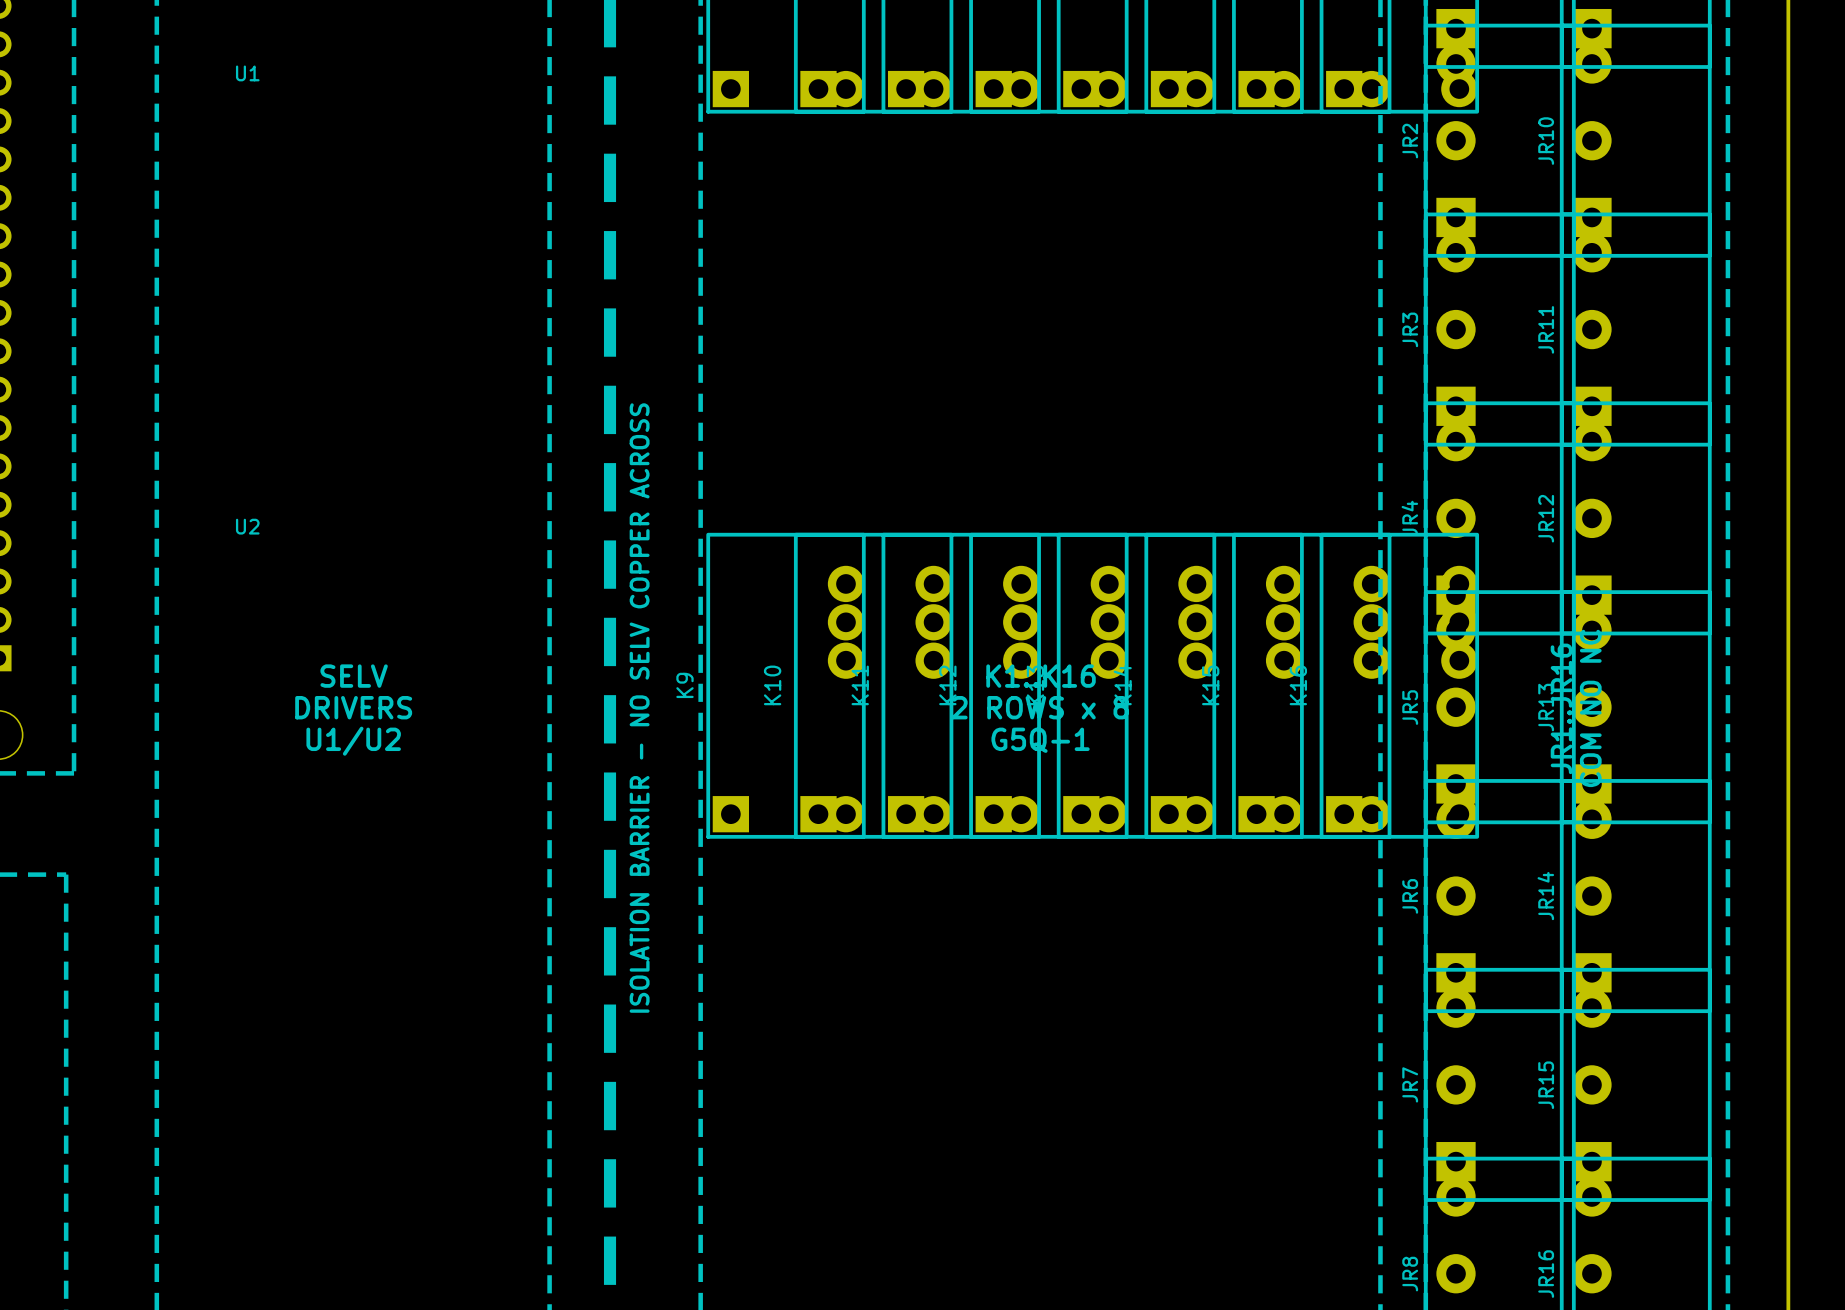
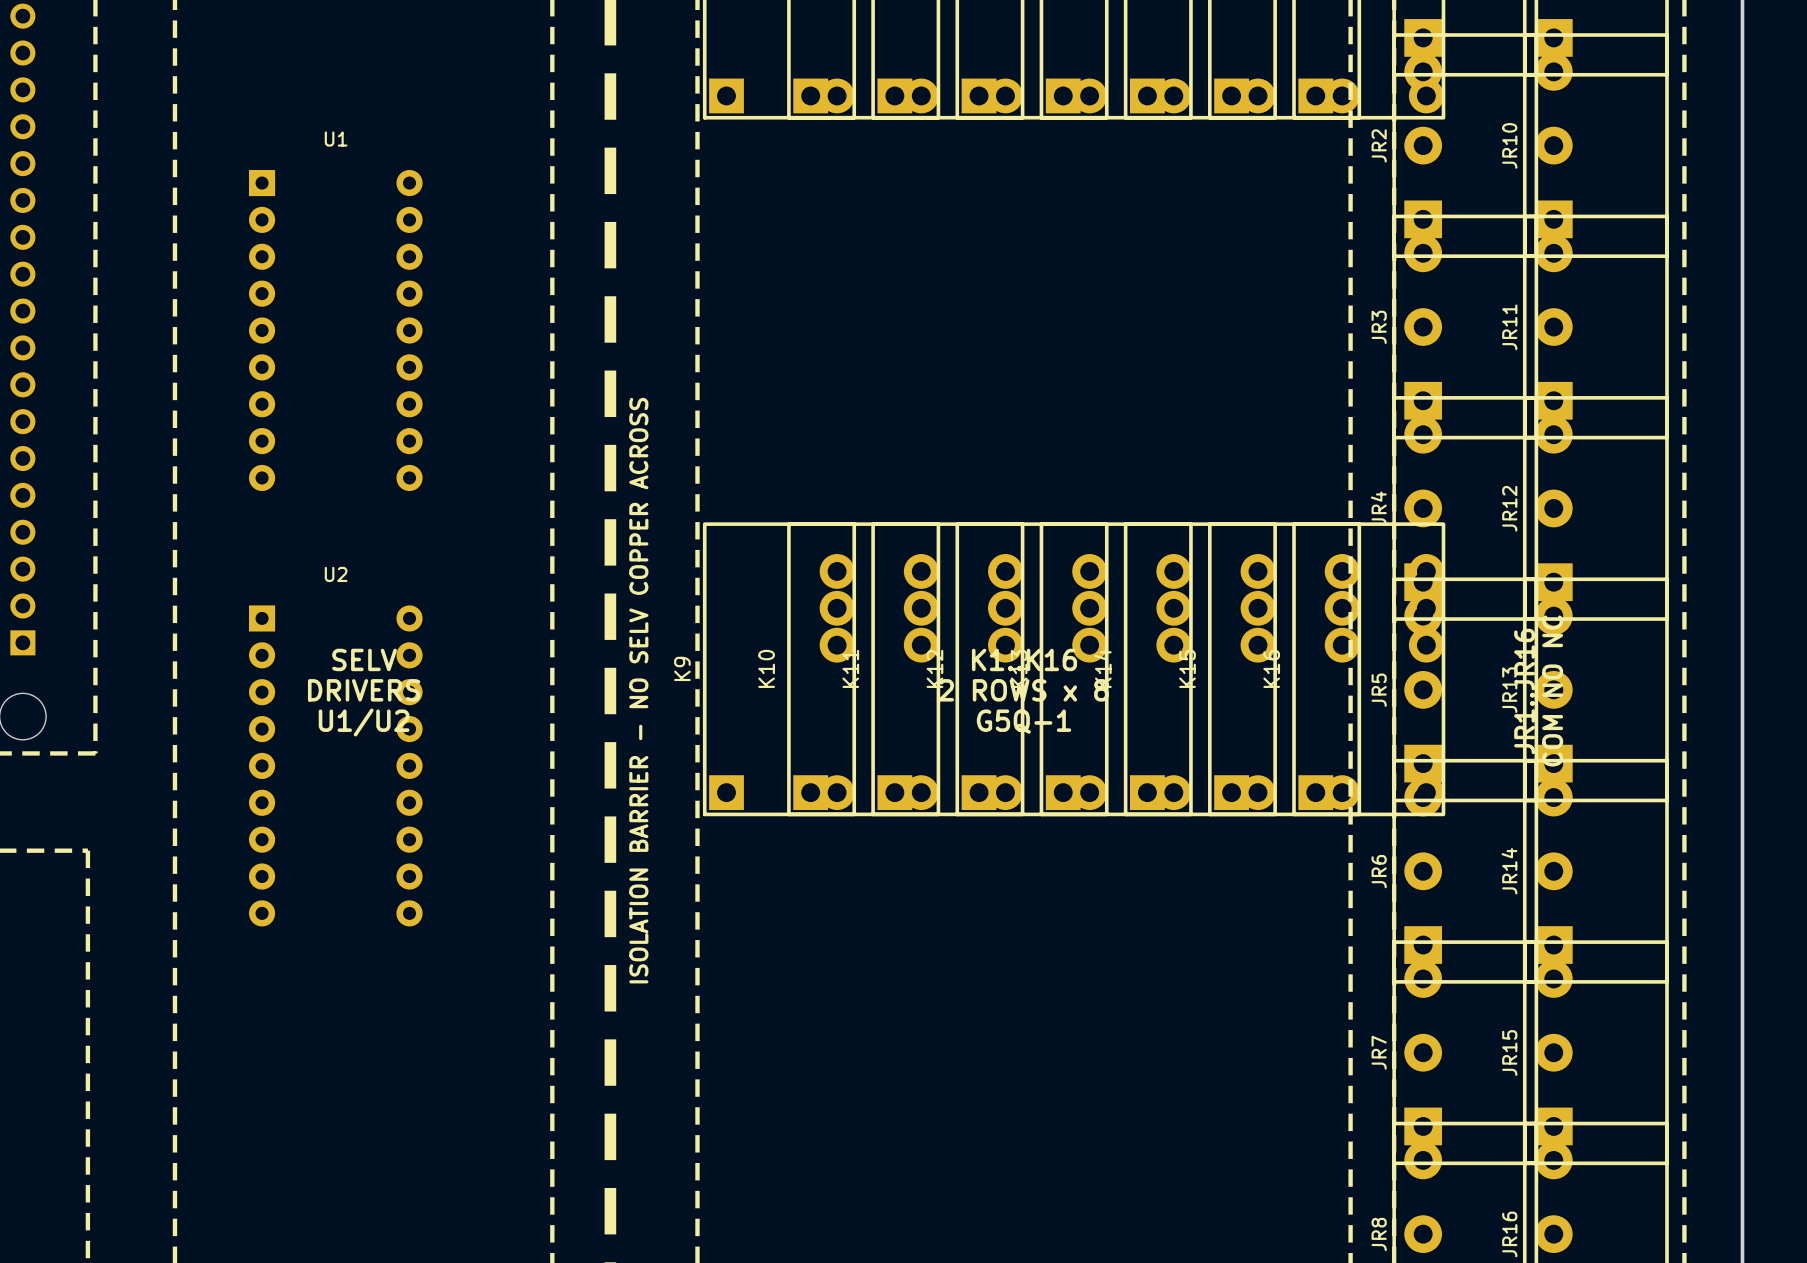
U1 footprint: [235, 65, 260, 82] -> [249, 169, 423, 492]
U1 name position: U1 (247, 73) -> U1 (336, 139)
U2 footprint: [235, 518, 260, 535] -> [249, 605, 423, 927]
U2 name position: U2 (247, 526) -> U2 (336, 574)

